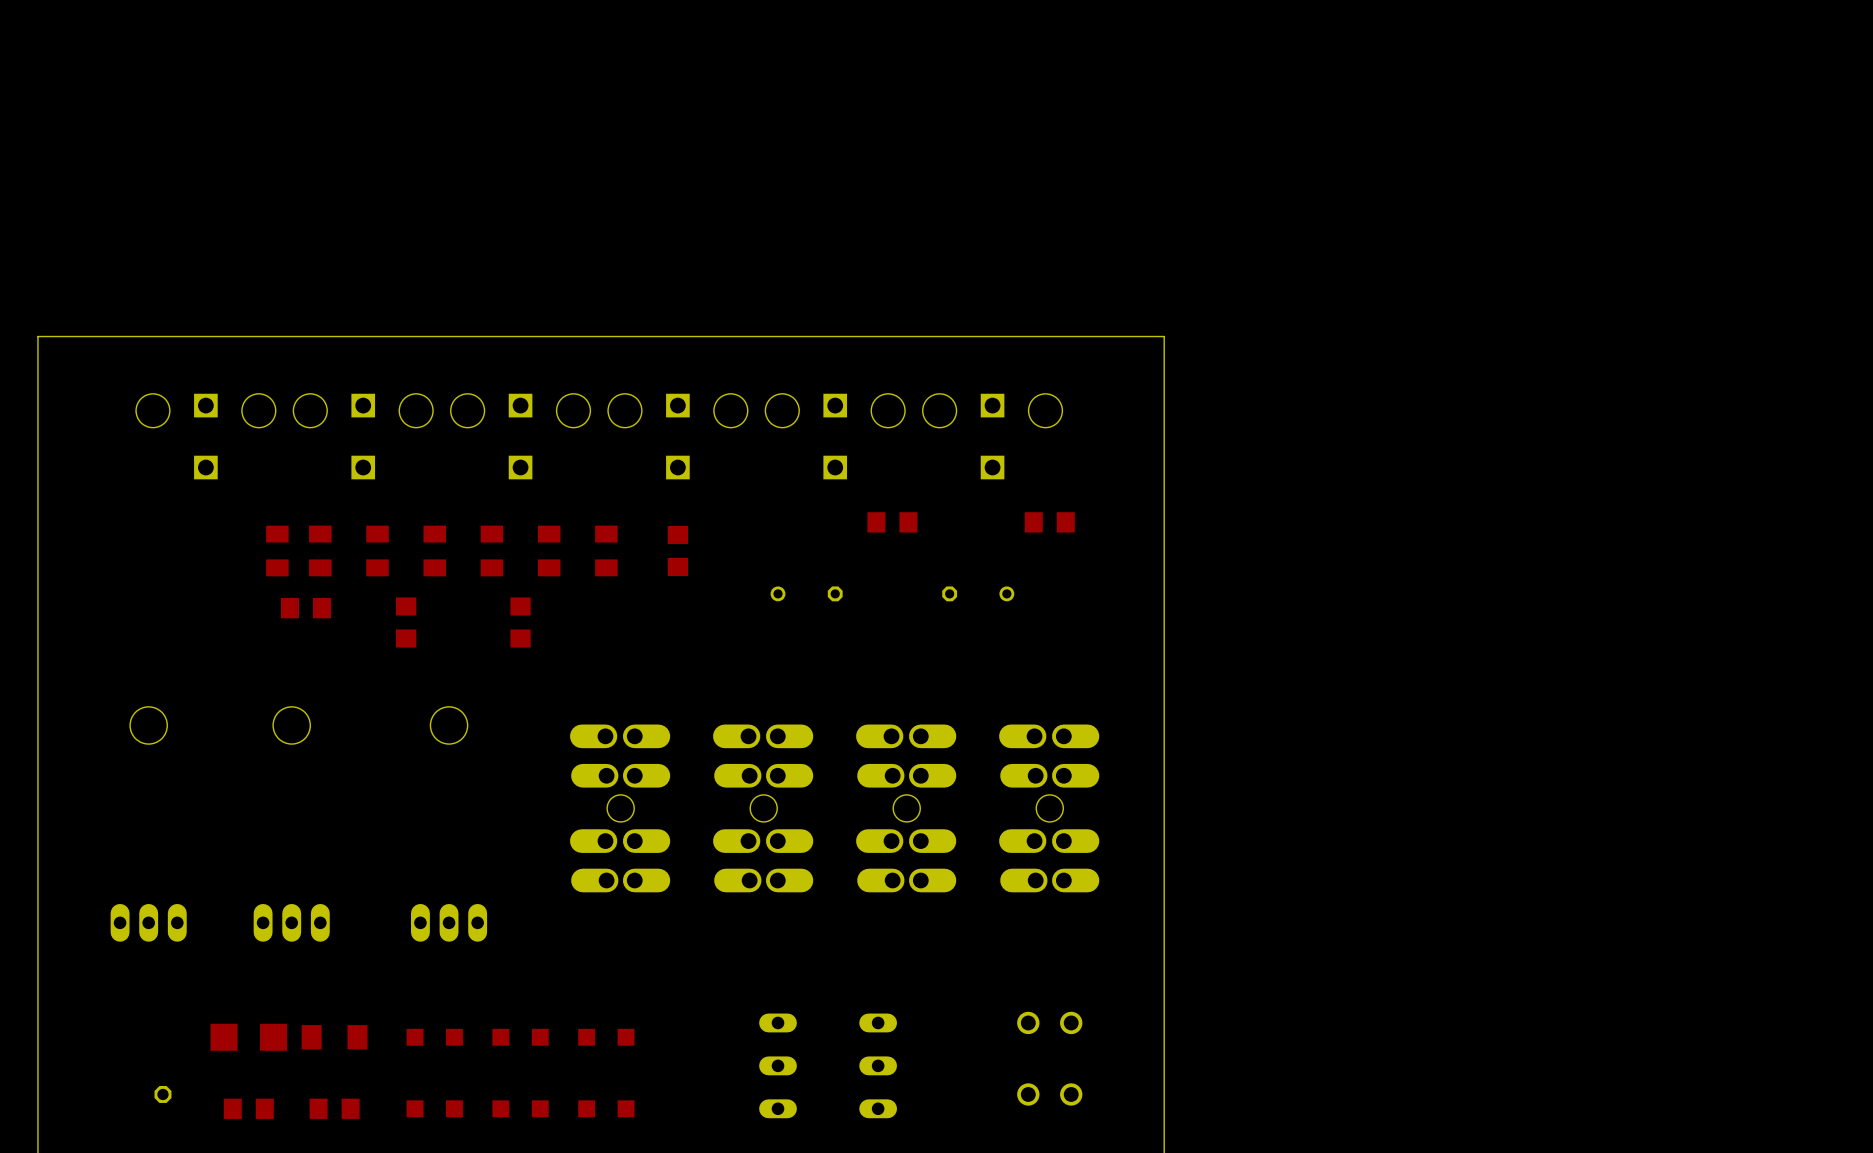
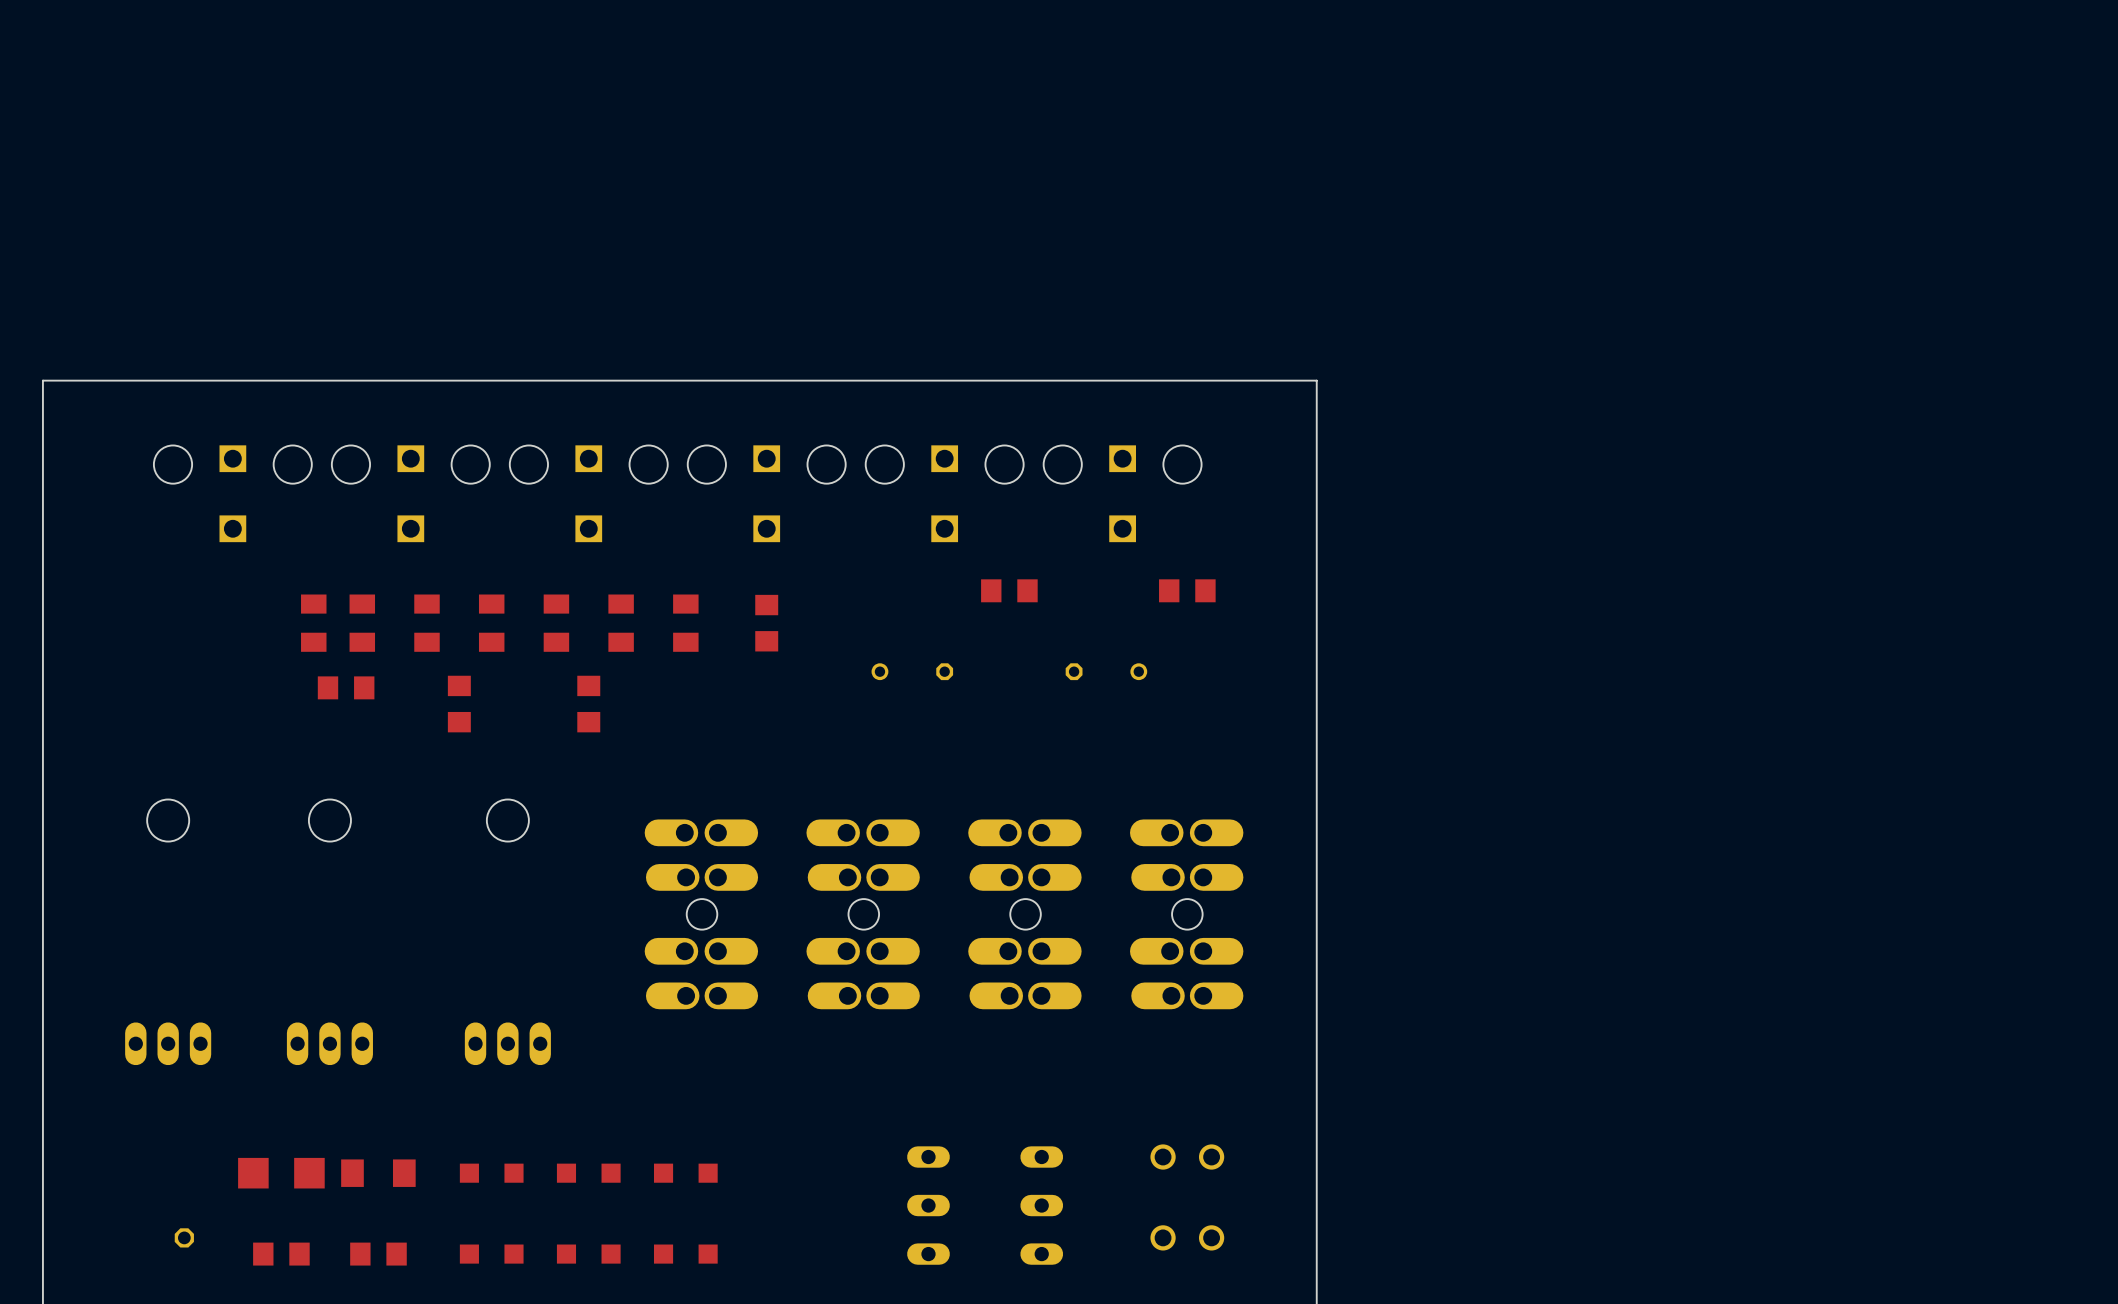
part: (778, 1065) -> none
part: none -> (928, 1205)
part: (878, 1065) -> none
part: none -> (1041, 1205)

